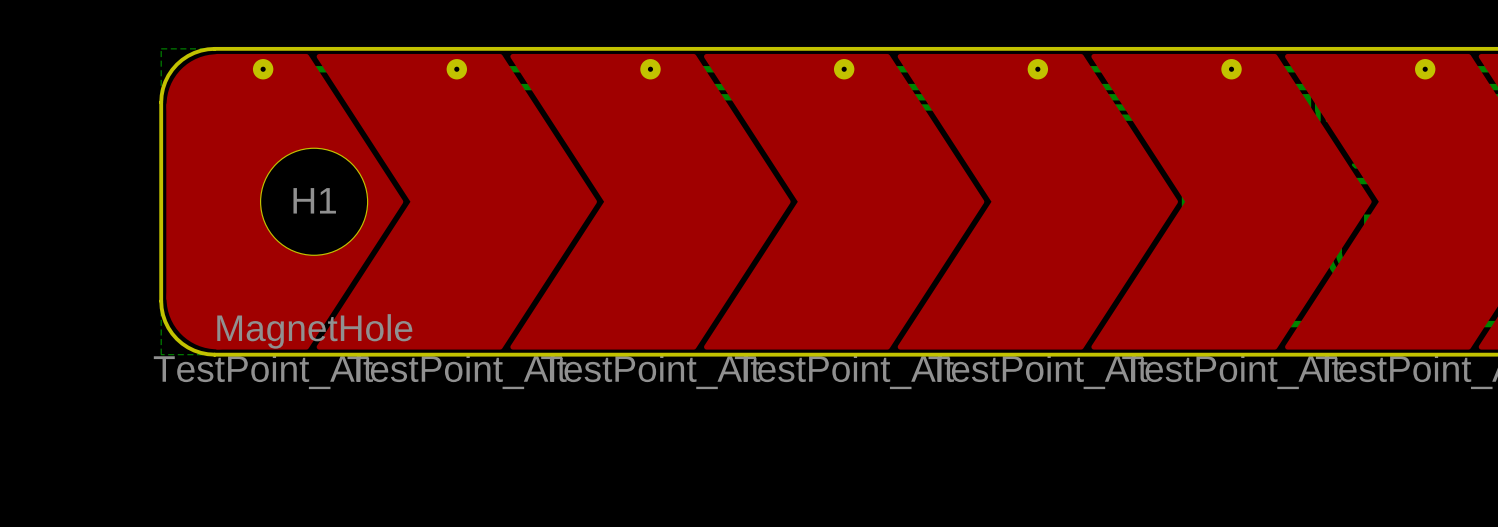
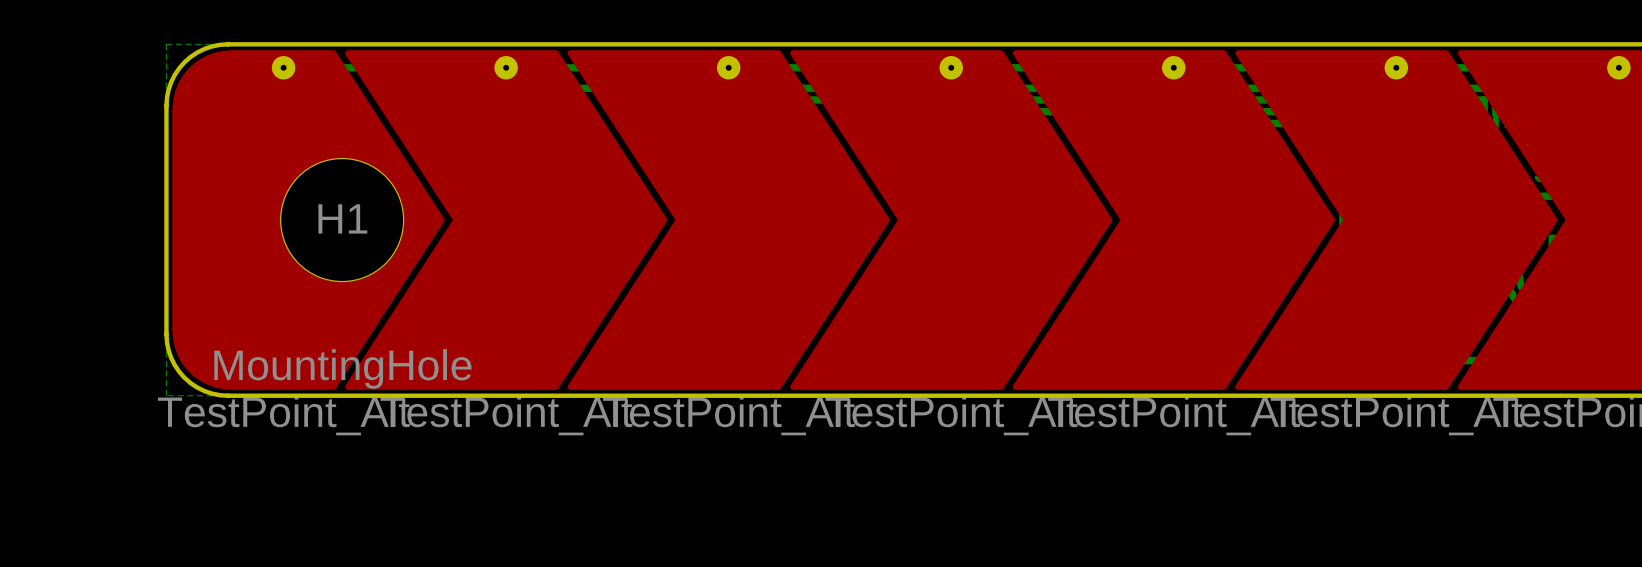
H1 value: MagnetHole (314, 331) -> MountingHole (342, 368)

